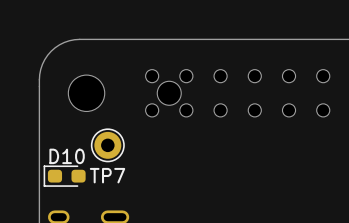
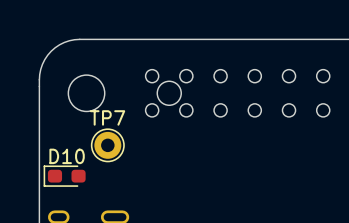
TP7 name position: TP7 (107, 175) -> TP7 (107, 117)

